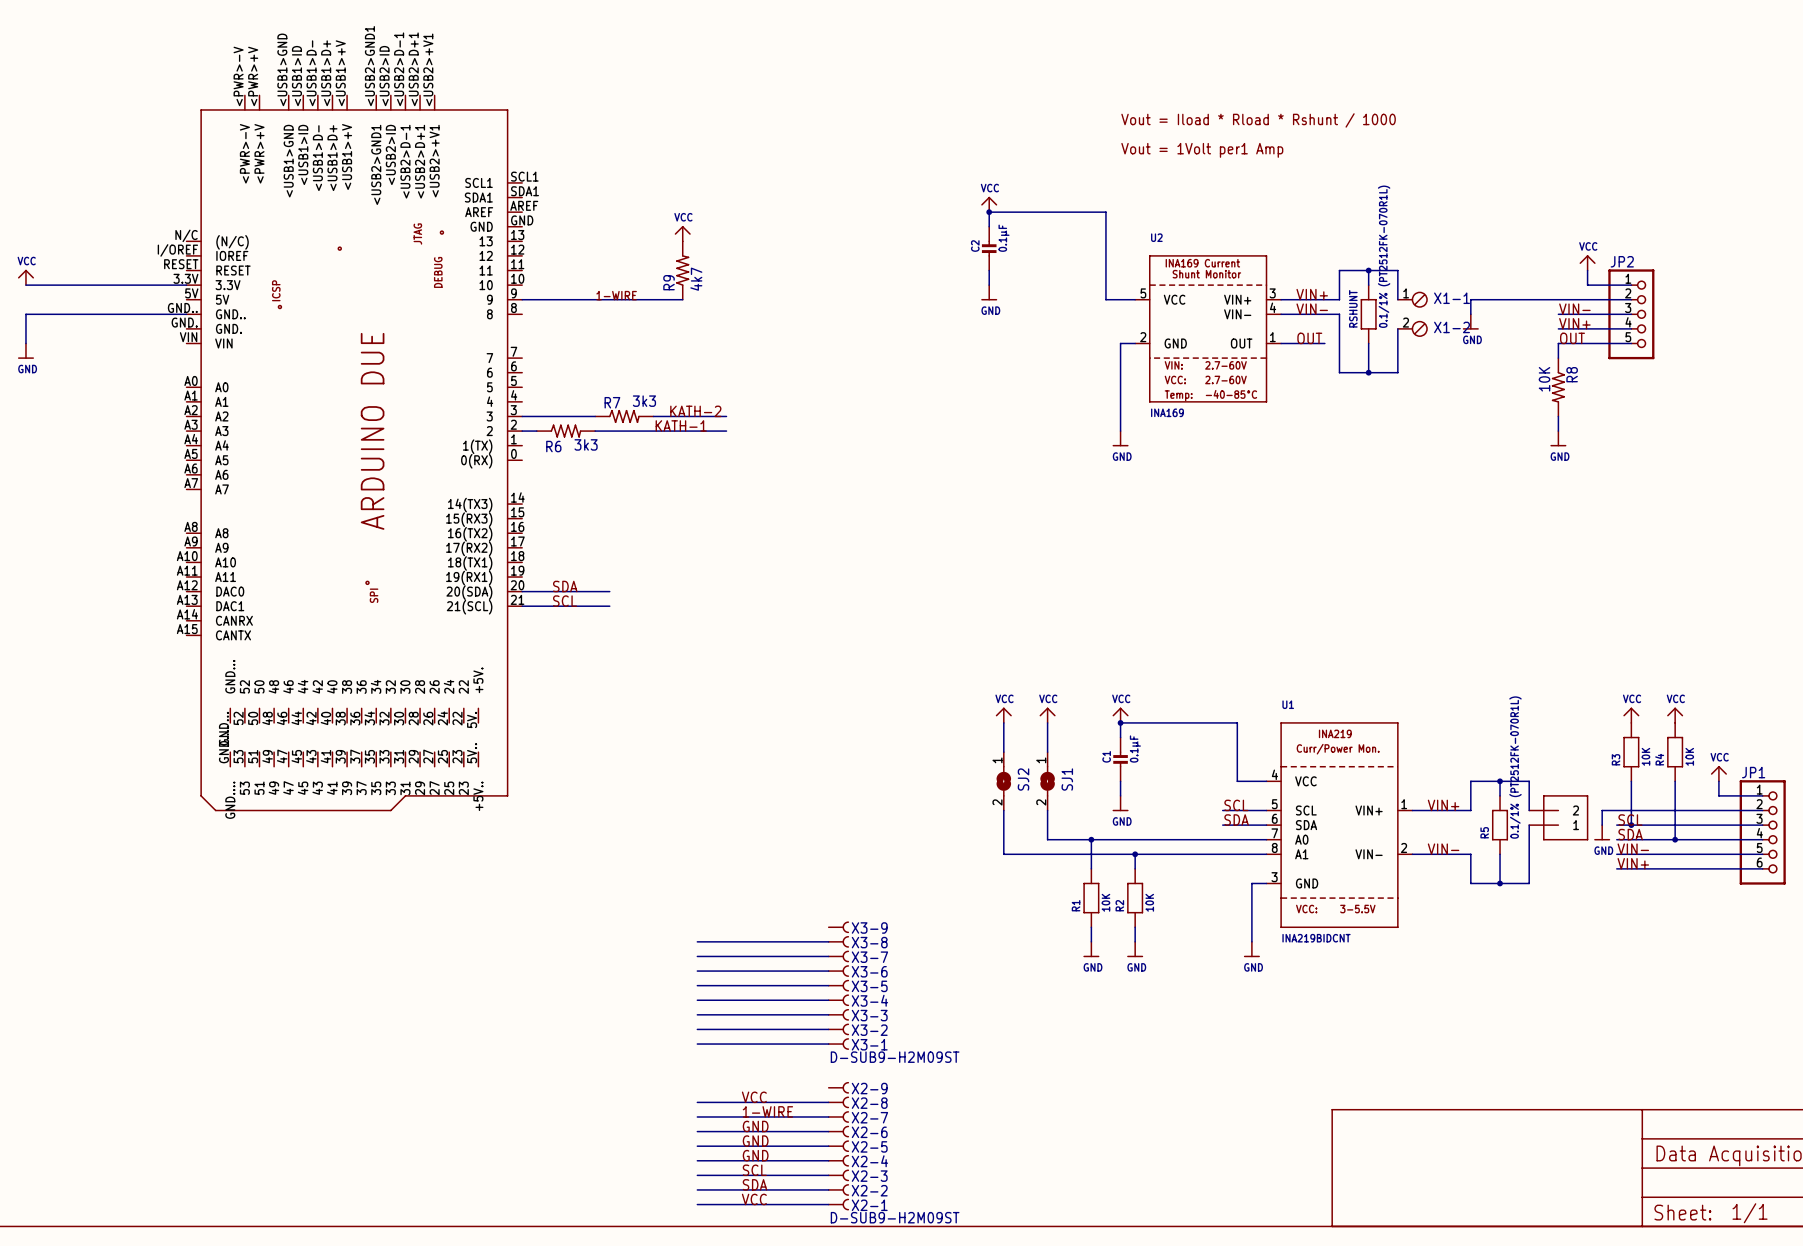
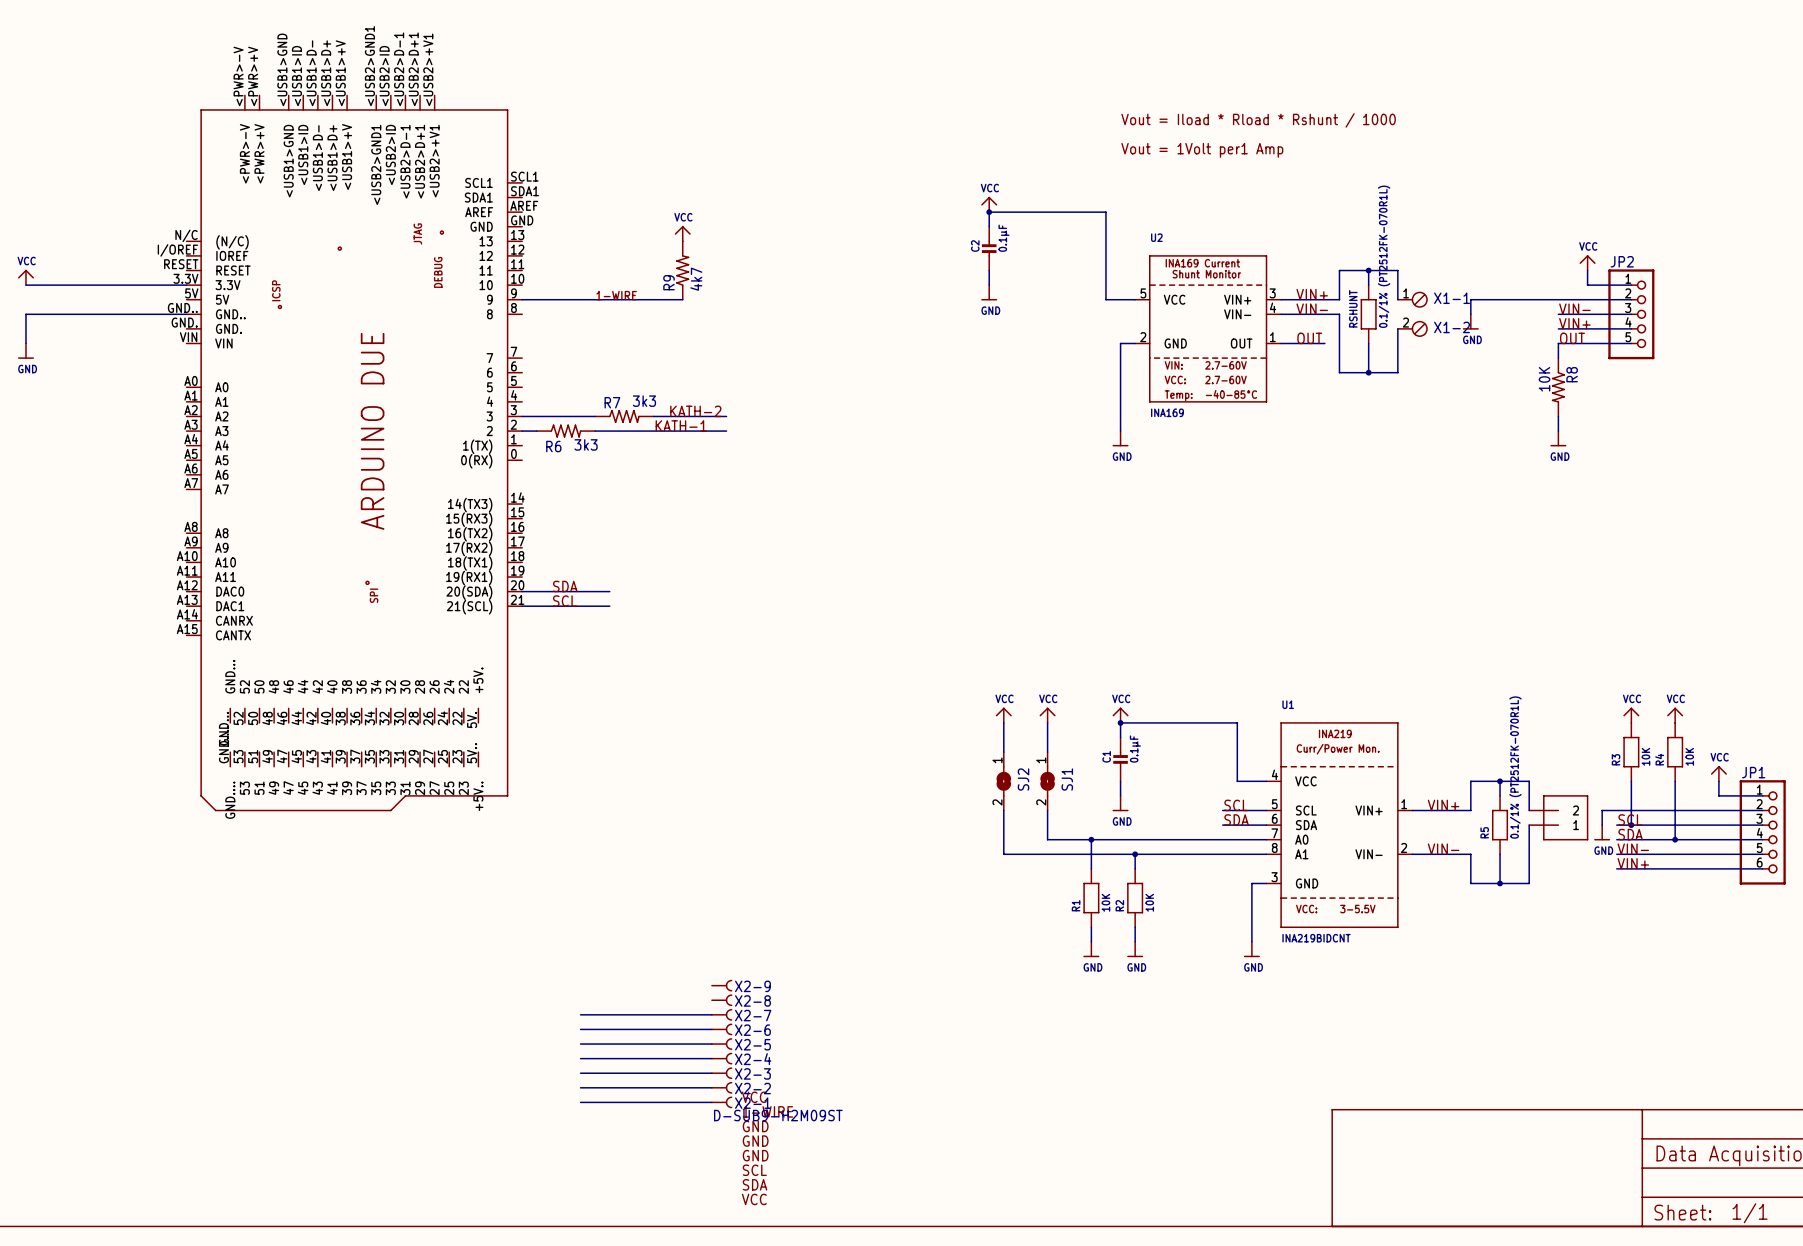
X3-9: (838, 927) -> none
wire: (697, 941) (828, 941) -> none
X3-8: (838, 941) -> none
wire: (697, 956) (828, 956) -> none
X3-7: (838, 956) -> none
wire: (697, 971) (828, 971) -> none
X3-6: (838, 971) -> none
wire: (697, 985) (828, 985) -> none
X3-5: (838, 985) -> none
wire: (697, 1000) (828, 1000) -> none
X3-4: (838, 1000) -> none
wire: (711, 1014) (828, 1014) -> (580, 1014) (697, 1014)
X3-3: (838, 1014) -> none
wire: (711, 1029) (828, 1029) -> (580, 1029) (697, 1029)
X3-2: (838, 1029) -> none
wire: (711, 1044) (828, 1044) -> (580, 1044) (697, 1044)
X3-1: D-SUB9-H2M09ST (838, 1044) -> none
X2-9 position: (838, 1087) -> (722, 985)
wire: (711, 1102) (828, 1102) -> (580, 1102) (697, 1102)
X2-8 position: (838, 1102) -> (722, 1000)
wire: (697, 1116) (828, 1116) -> (580, 1058) (711, 1058)
X2-7 position: (838, 1116) -> (722, 1014)
wire: (697, 1131) (828, 1131) -> (580, 1073) (711, 1073)
X2-6 position: (838, 1131) -> (722, 1029)
wire: (697, 1146) (828, 1146) -> (580, 1087) (711, 1087)
X2-5 position: (838, 1146) -> (722, 1044)
wire: (697, 1160) (828, 1160) -> none
X2-4 position: (838, 1160) -> (722, 1058)
wire: (697, 1175) (828, 1175) -> none
X2-3 position: (838, 1175) -> (722, 1073)
wire: (697, 1189) (828, 1189) -> none
X2-2 position: (838, 1189) -> (722, 1087)
wire: (697, 1204) (828, 1204) -> none
X2-1 position: (838, 1204) -> (722, 1102)

